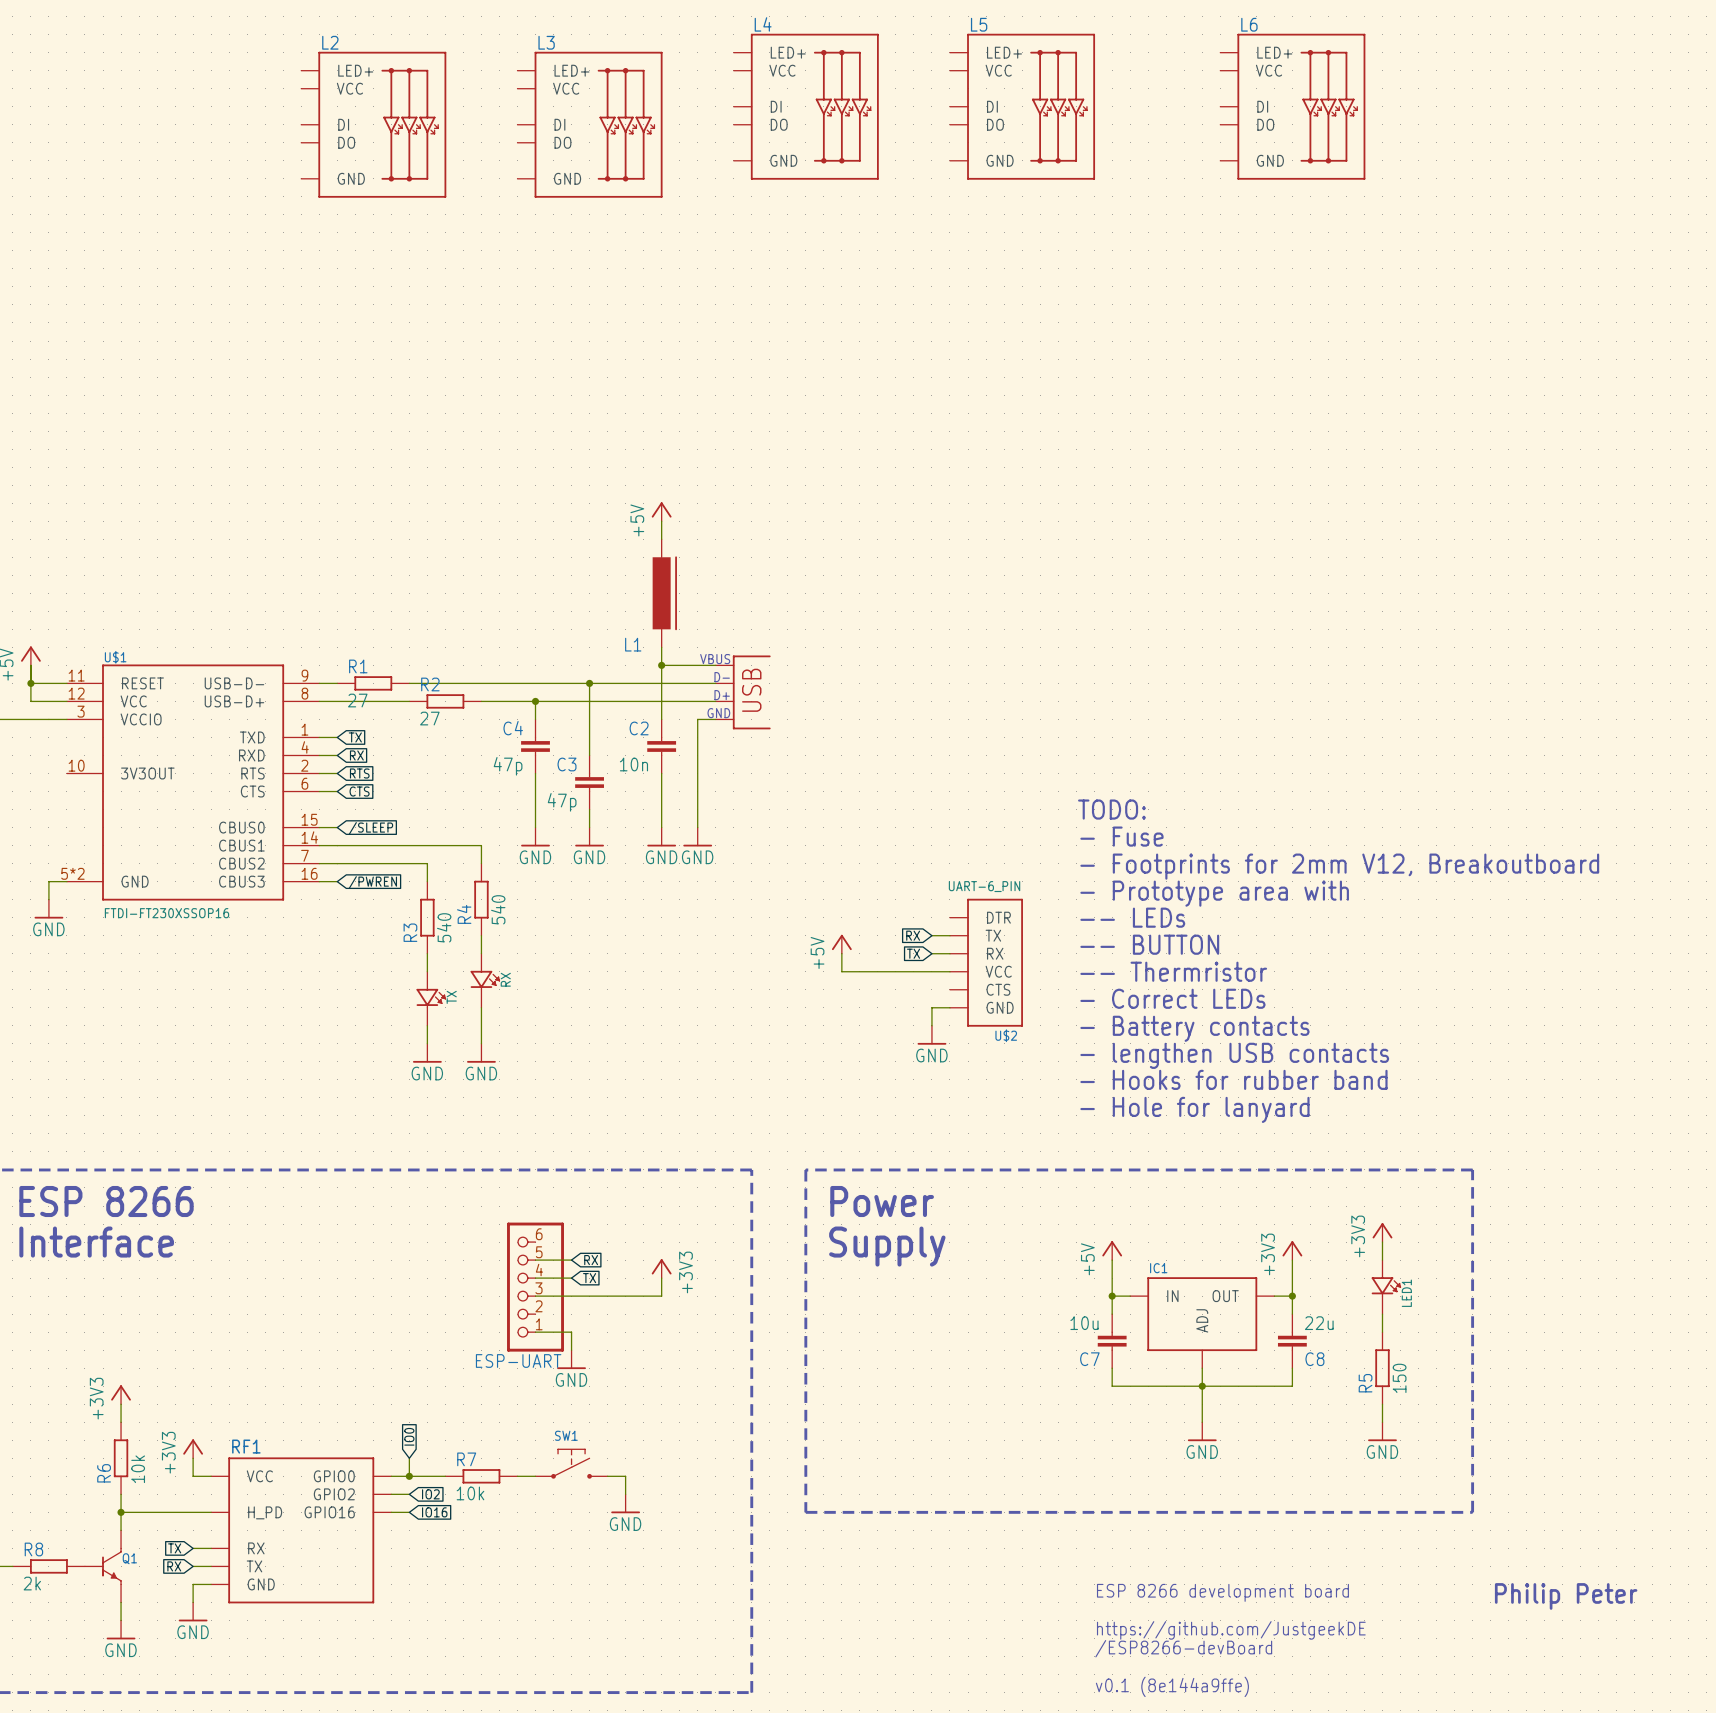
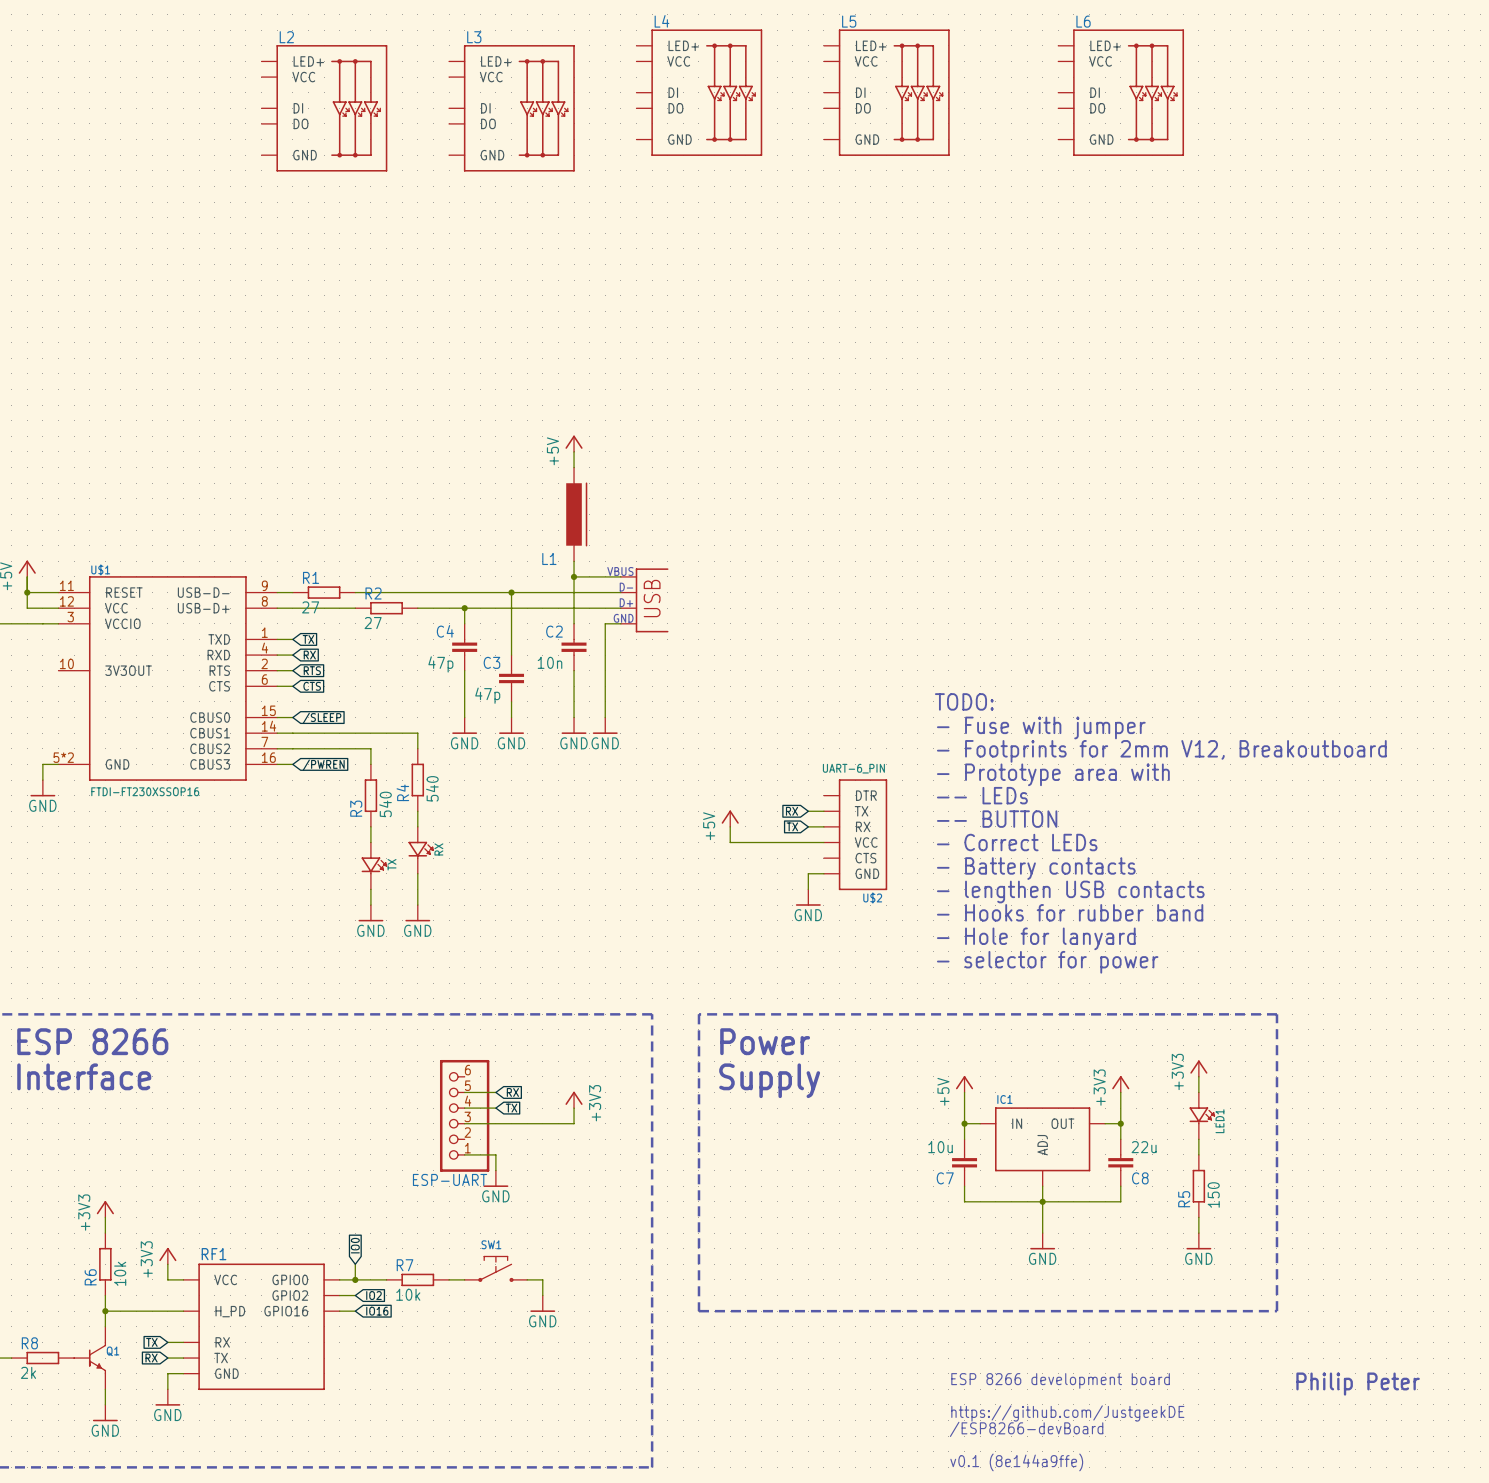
text: - Fuse (1121, 836) -> - Fuse with jumper (1041, 727)
text: -- Thermristor (1173, 971) -> - Correct LEDs (1017, 842)
text: - Correct LEDs (1172, 998) -> - Battery contacts (1036, 868)
text: - Battery contacts (1194, 1028) -> - lengthen USB contacts (1070, 891)
text: - lengthen USB contacts (1234, 1055) -> - Hooks for rubber band (1070, 912)
text: - Hooks for rubber band (1233, 1079) -> - Hole for lanyard (1036, 938)
text: - Hole for lanyard (1194, 1109) -> - selector for power (1047, 962)

